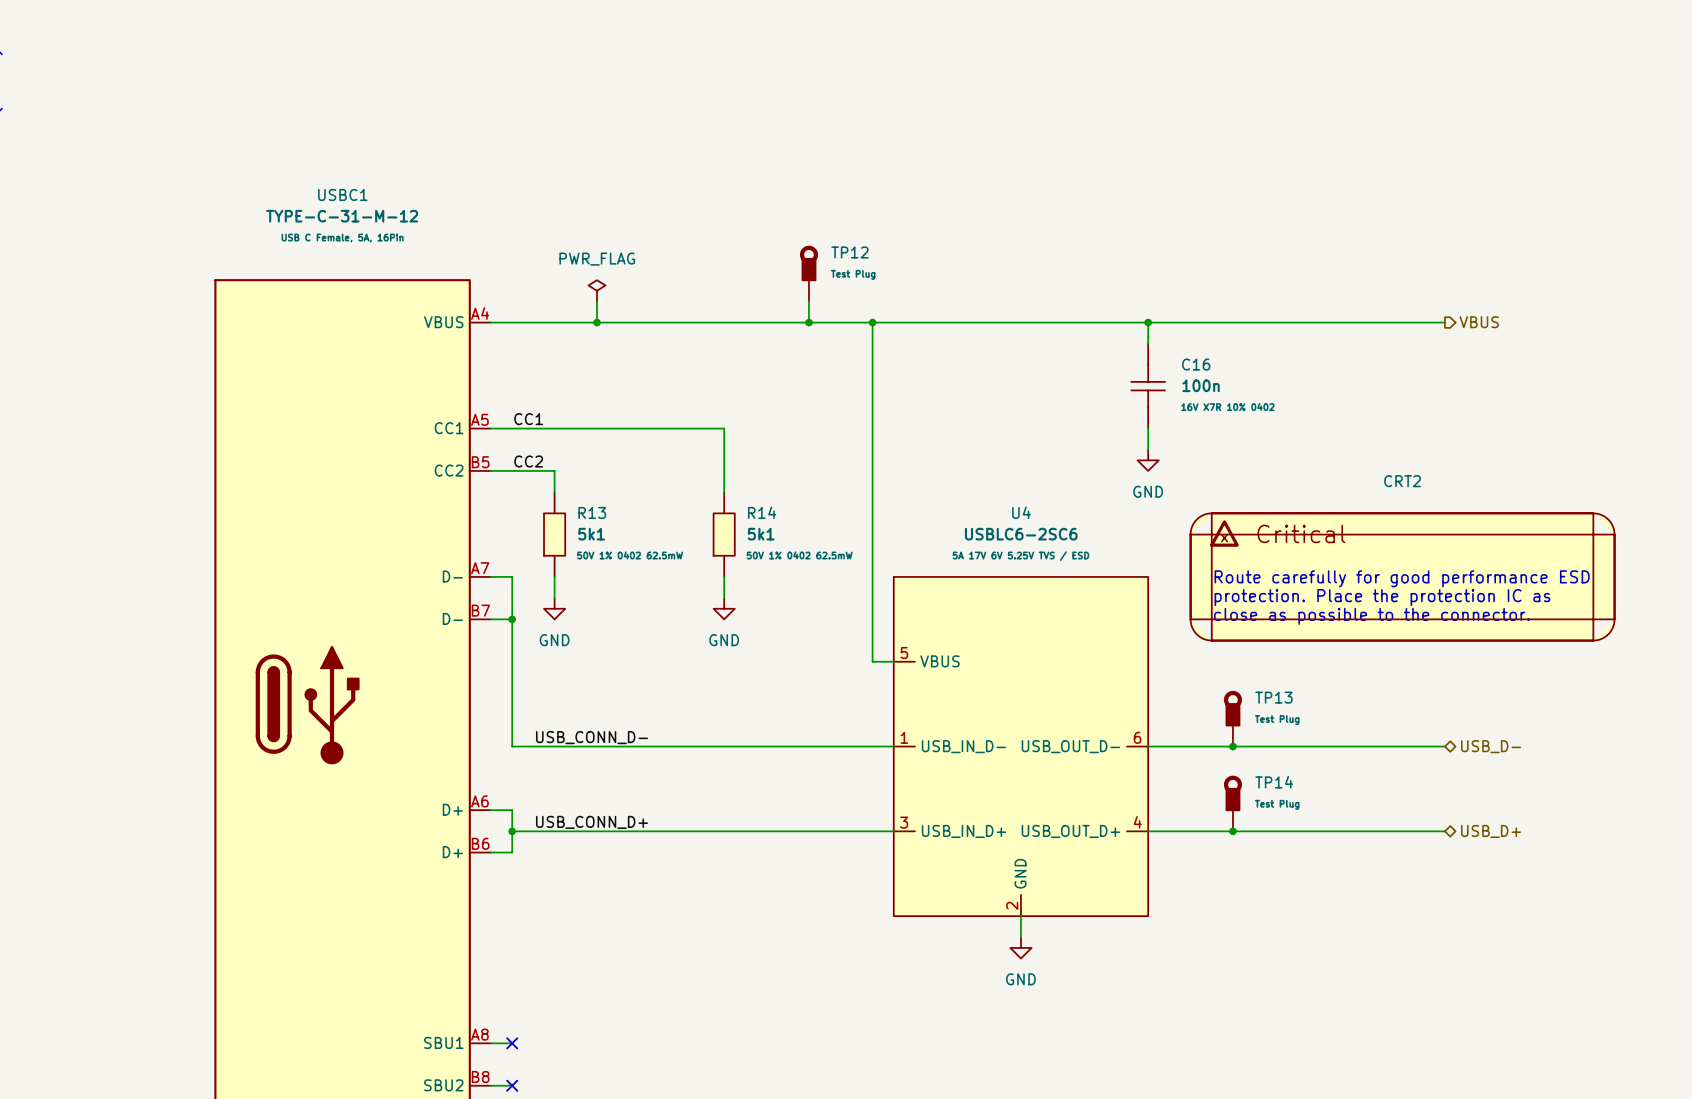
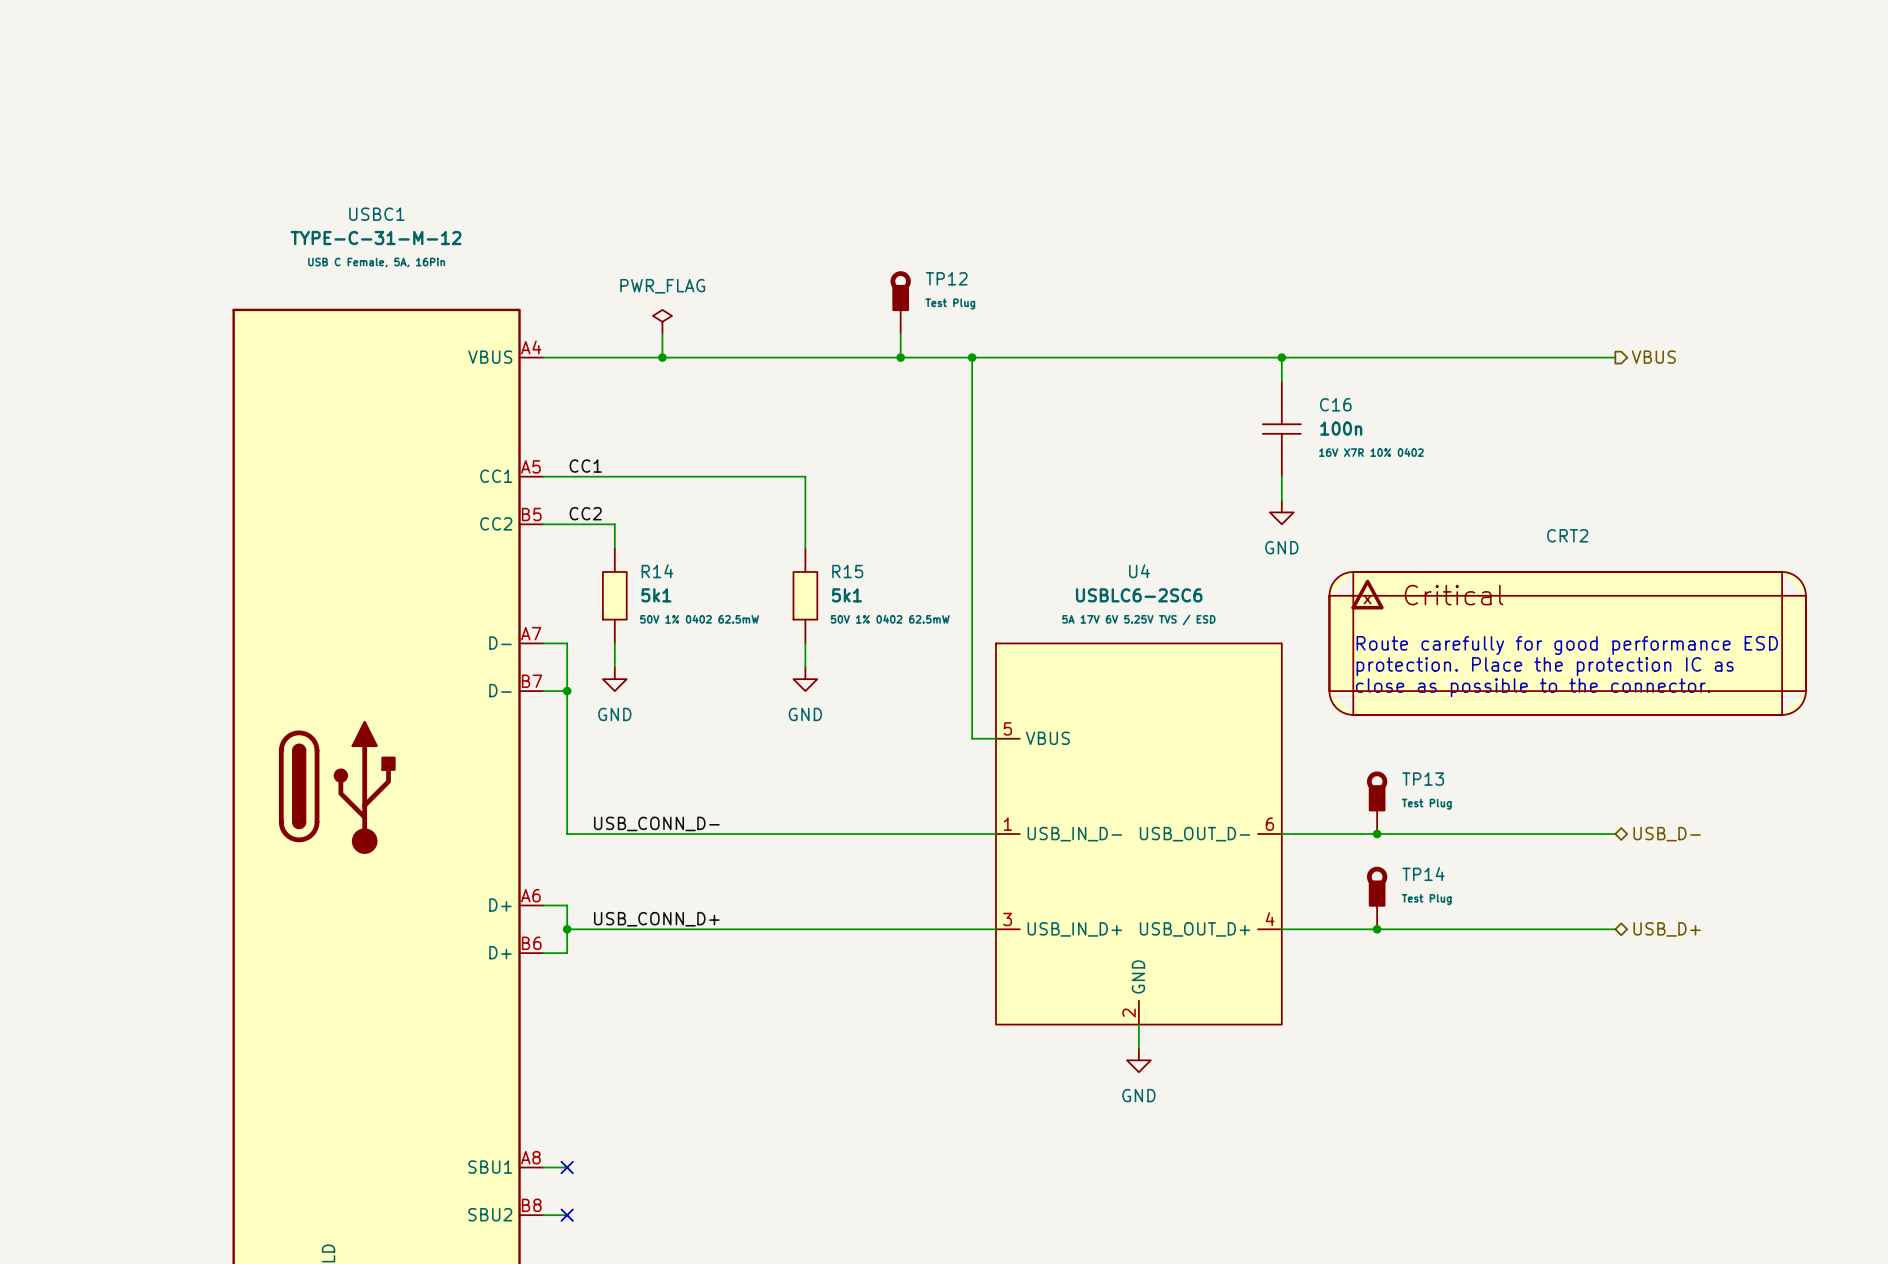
R13 name: R13 (592, 512) -> R14 (657, 571)
R14 name: R14 (762, 512) -> R15 (847, 571)

